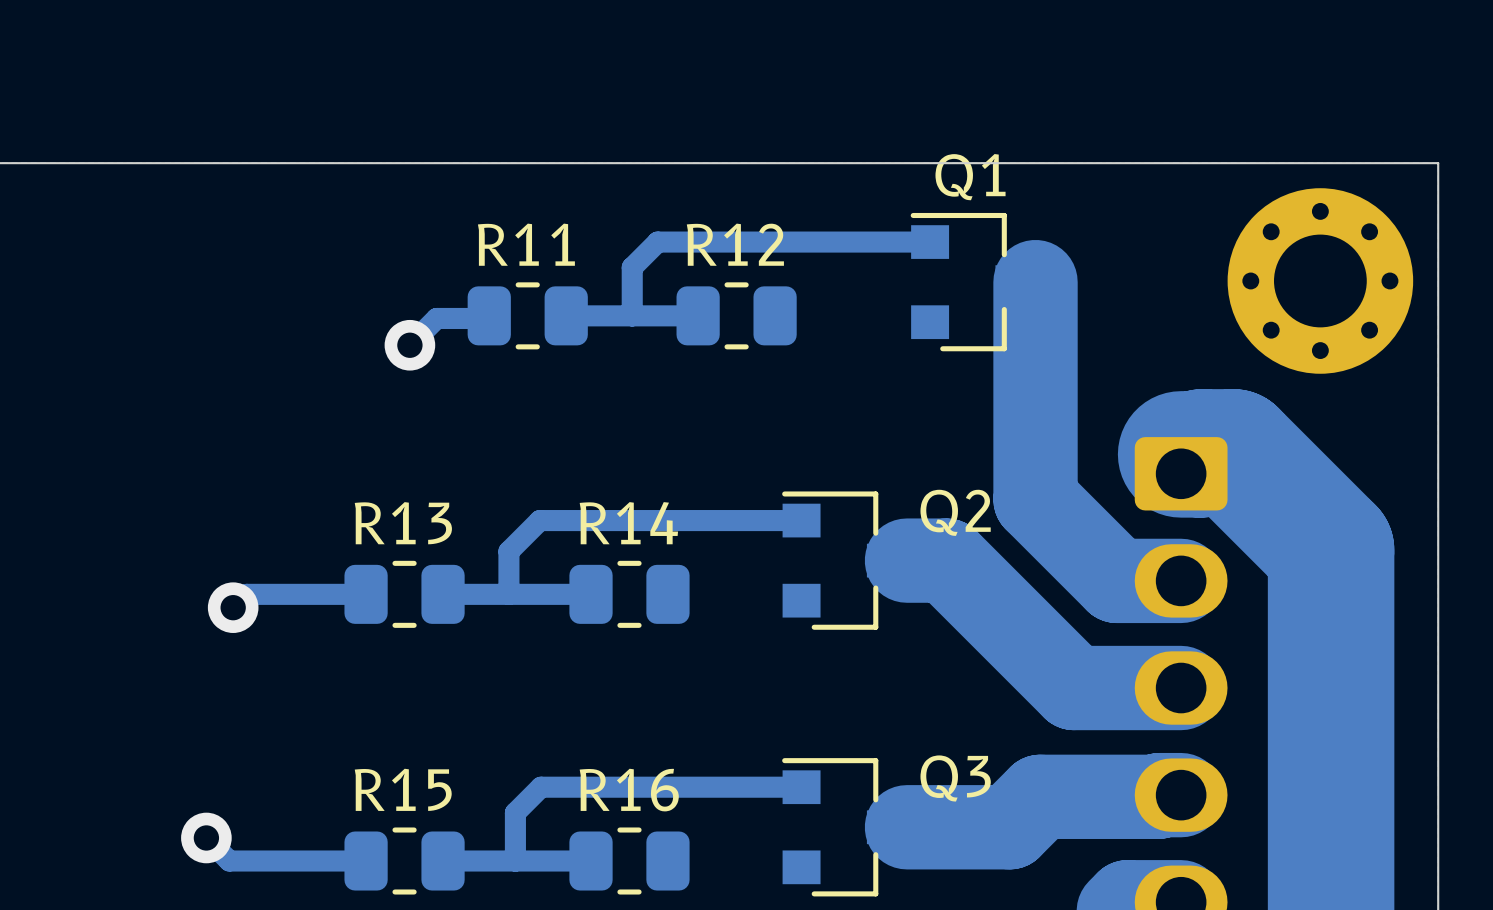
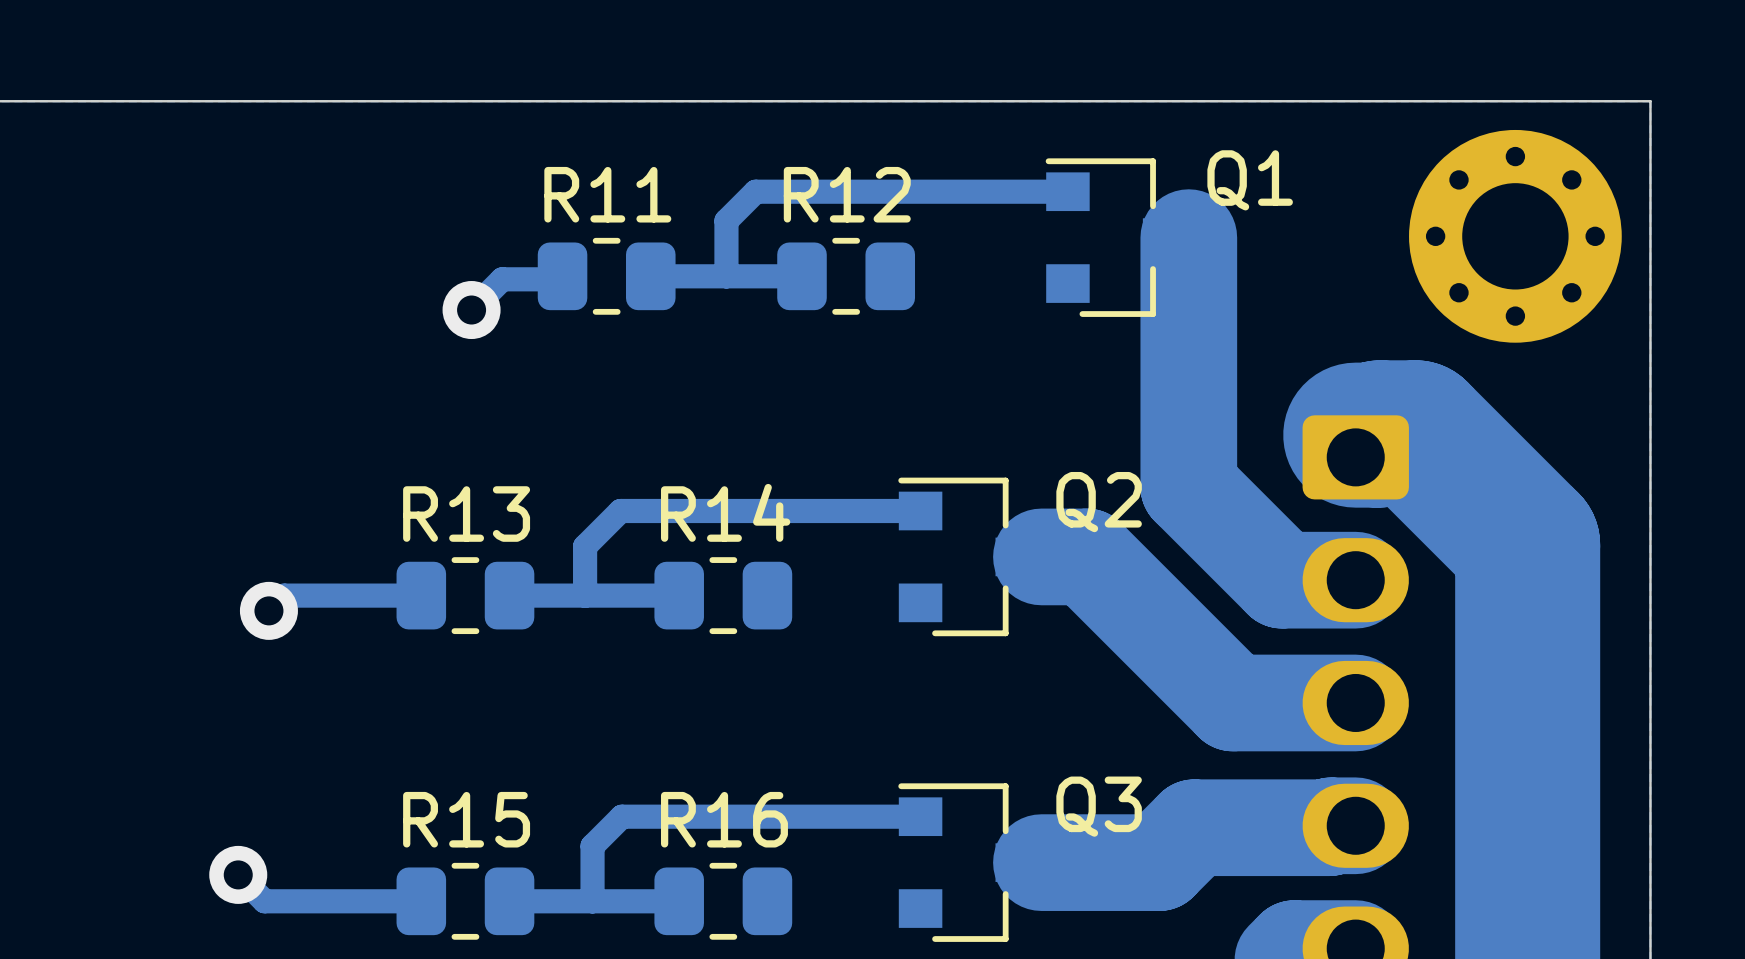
Q1 name position: Q1 (970, 177) -> Q1 (1250, 180)

